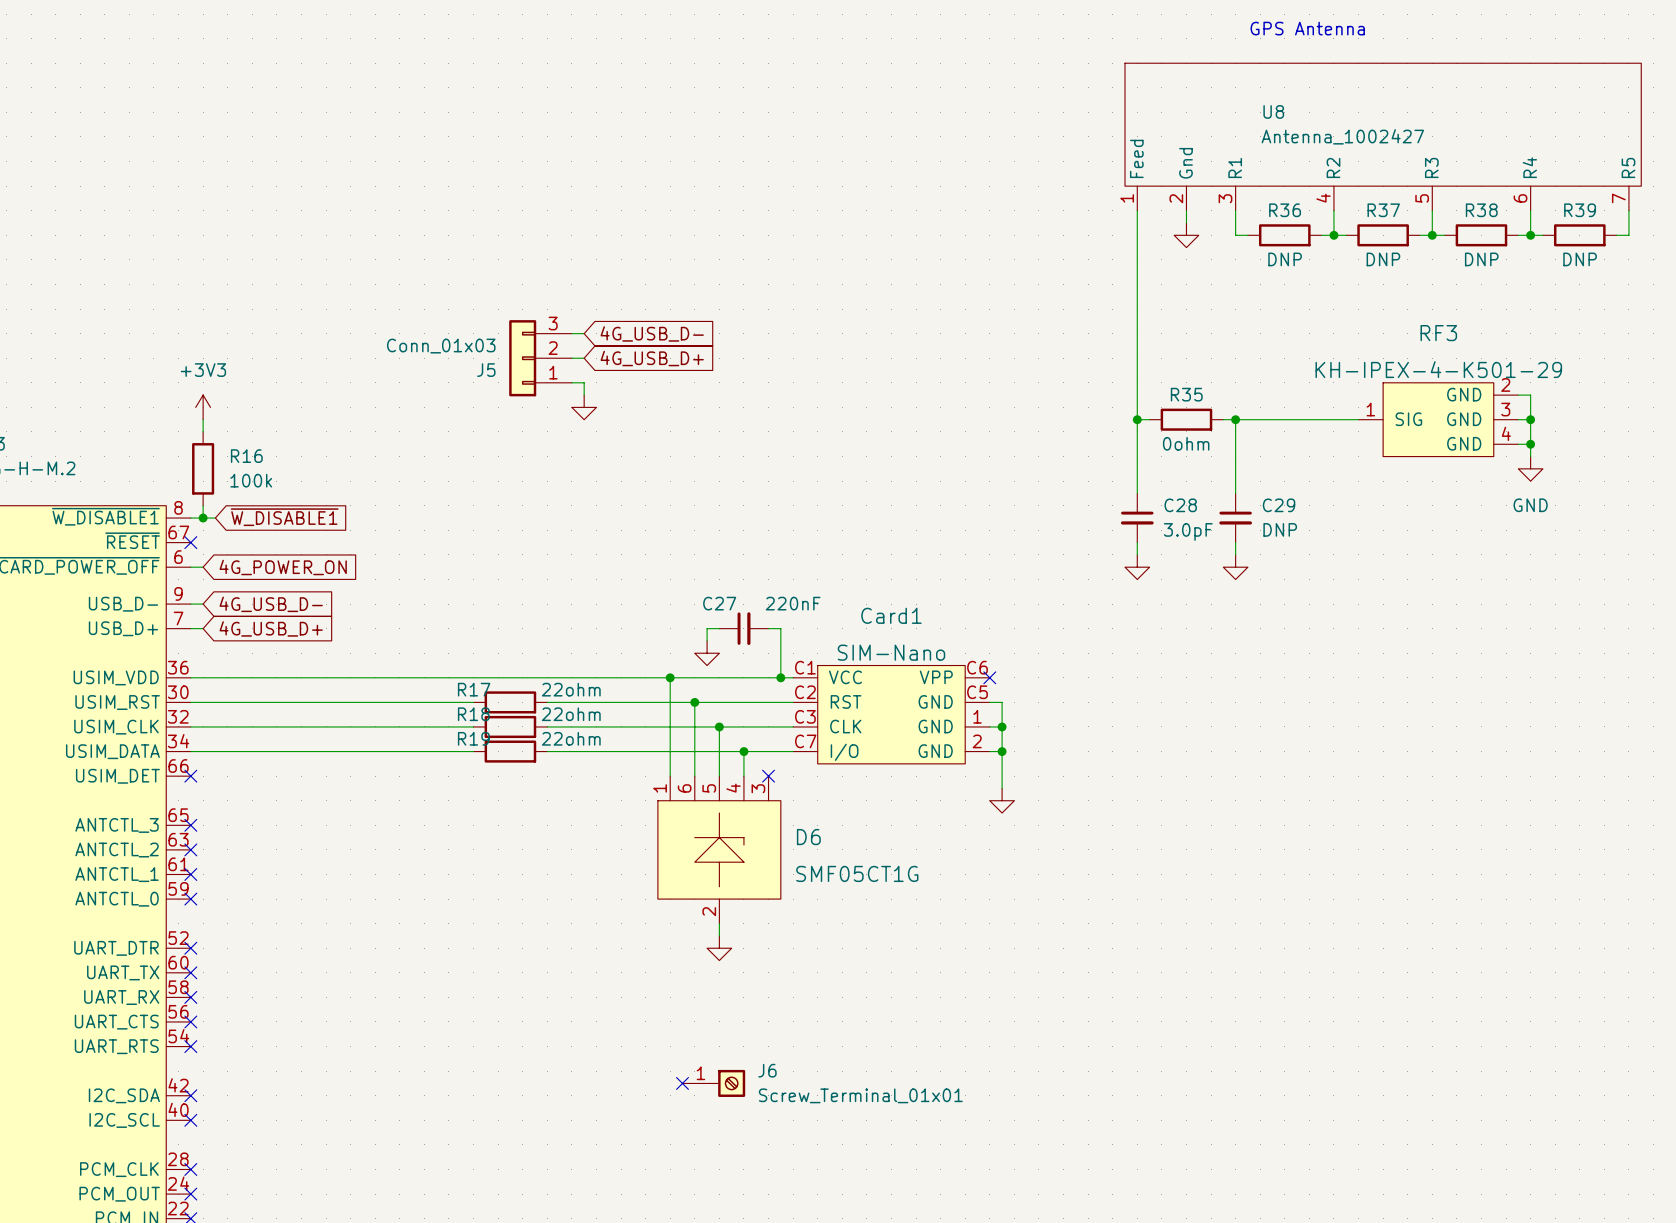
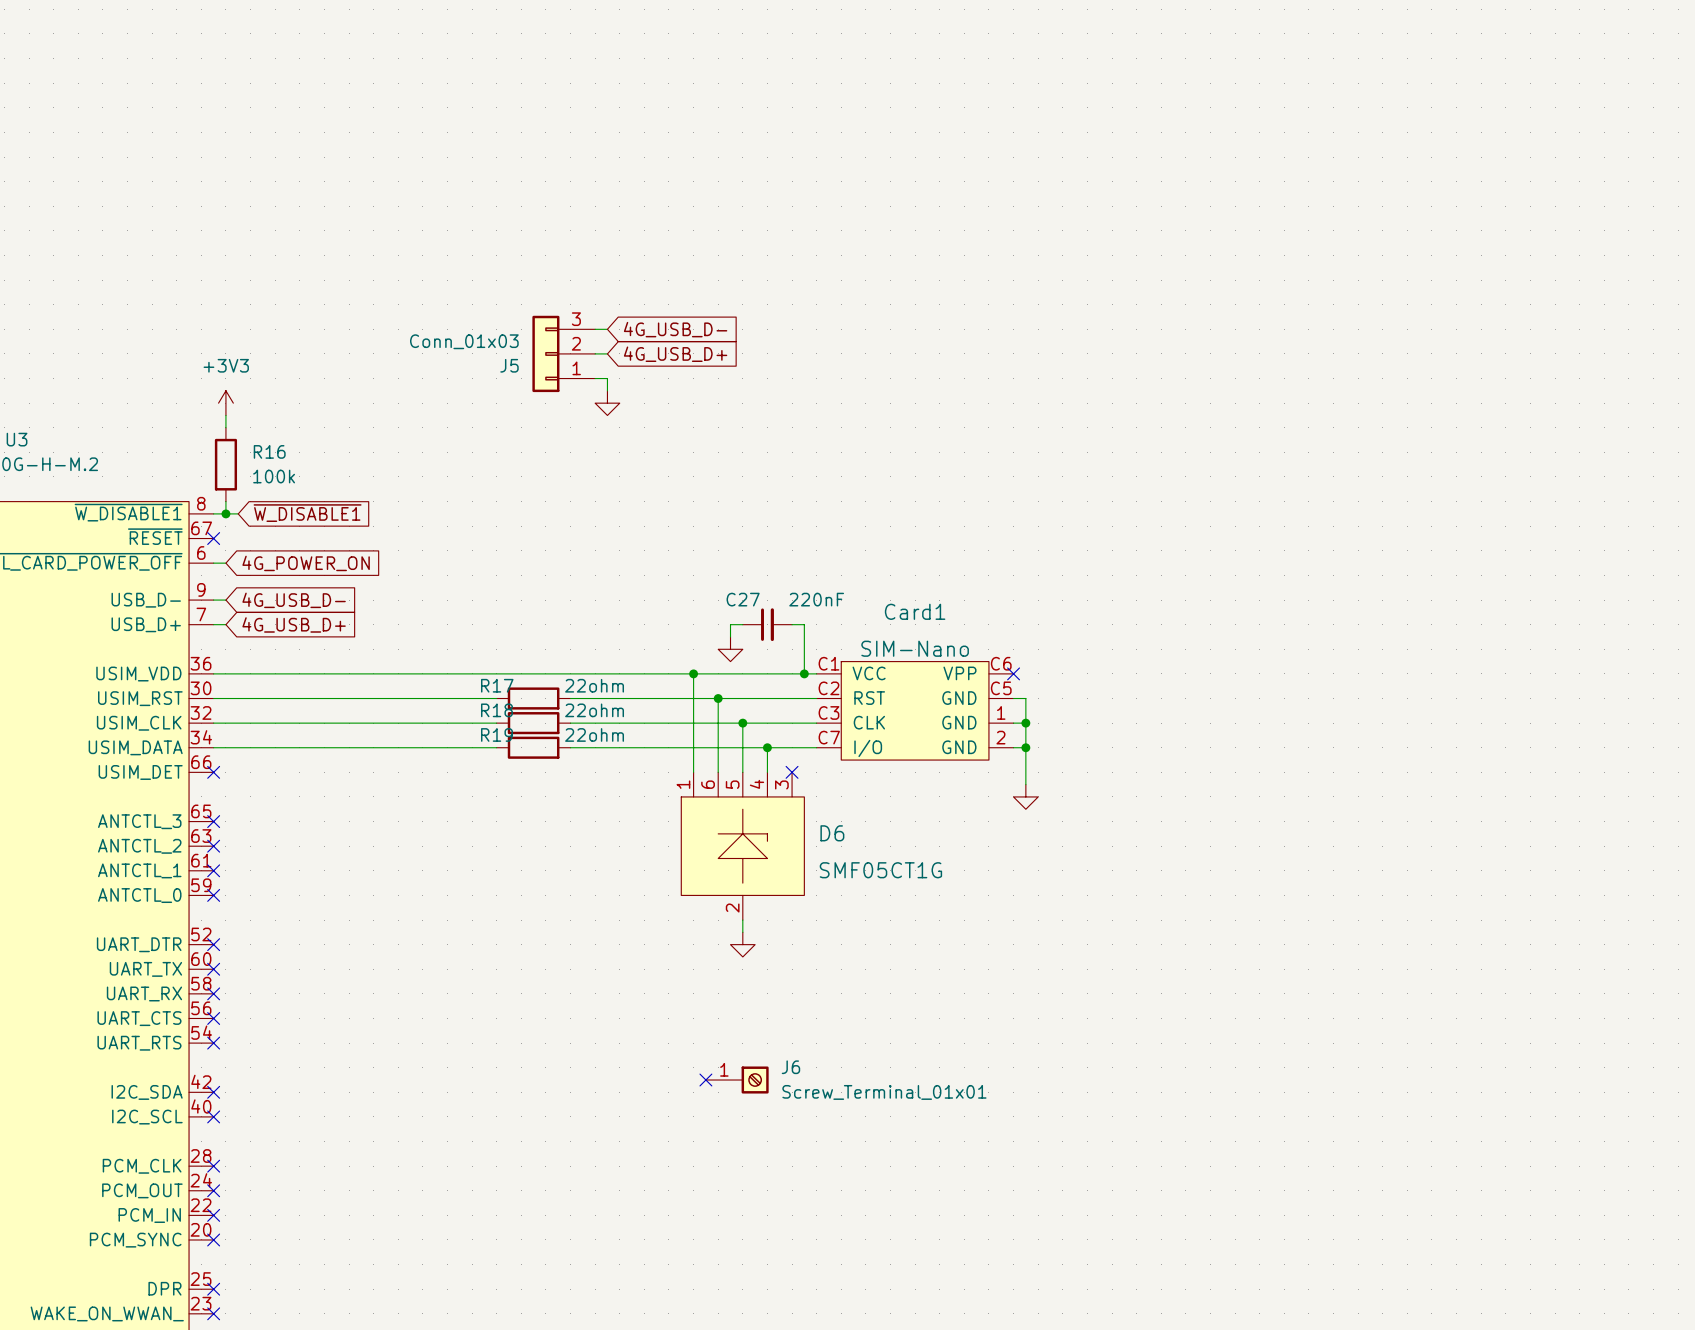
text: GPS Antenna (1307, 28) -> none
U8: Antenna_1002427 (1383, 136) -> none
wire: (1137, 210) (1137, 493) -> none
wire: (1186, 210) (1186, 223) -> none
wire: (1235, 210) (1235, 235) (1247, 235) -> none
wire: (1333, 210) (1333, 235) -> none
wire: (1432, 210) (1432, 235) -> none
wire: (1530, 210) (1530, 235) -> none
wire: (1628, 210) (1628, 235) (1616, 235) -> none
power symbol: (1186, 235) -> none
R36: DNP (1284, 235) -> none
wire: (1321, 235) (1346, 235) -> none
junction: (1333, 235) -> none
R37: DNP (1383, 235) -> none
wire: (1420, 235) (1444, 235) -> none
junction: (1432, 235) -> none
R38: DNP (1481, 235) -> none
wire: (1518, 235) (1542, 235) -> none
junction: (1530, 235) -> none
R39: DNP (1579, 235) -> none
wire: (1518, 395) (1530, 395) (1530, 456) -> none
wire: (1137, 419) (1149, 419) -> none
junction: (1137, 419) -> none
R35: 0ohm (1186, 419) -> none
wire: (1223, 419) (1358, 419) -> none
wire: (1235, 419) (1235, 493) -> none
junction: (1235, 419) -> none
RF3: KH-IPEX-4-K501-29 (1438, 419) -> none
wire: (1518, 419) (1530, 419) -> none
junction: (1530, 419) -> none
wire: (1518, 444) (1530, 444) -> none
junction: (1530, 444) -> none
power symbol: GND (1530, 468) -> none
C28: 3.0pF (1137, 518) -> none
C29: DNP (1235, 518) -> none
wire: (1137, 542) (1137, 554) -> none
wire: (1235, 542) (1235, 554) -> none
power symbol: (1137, 567) -> none
power symbol: (1235, 567) -> none

